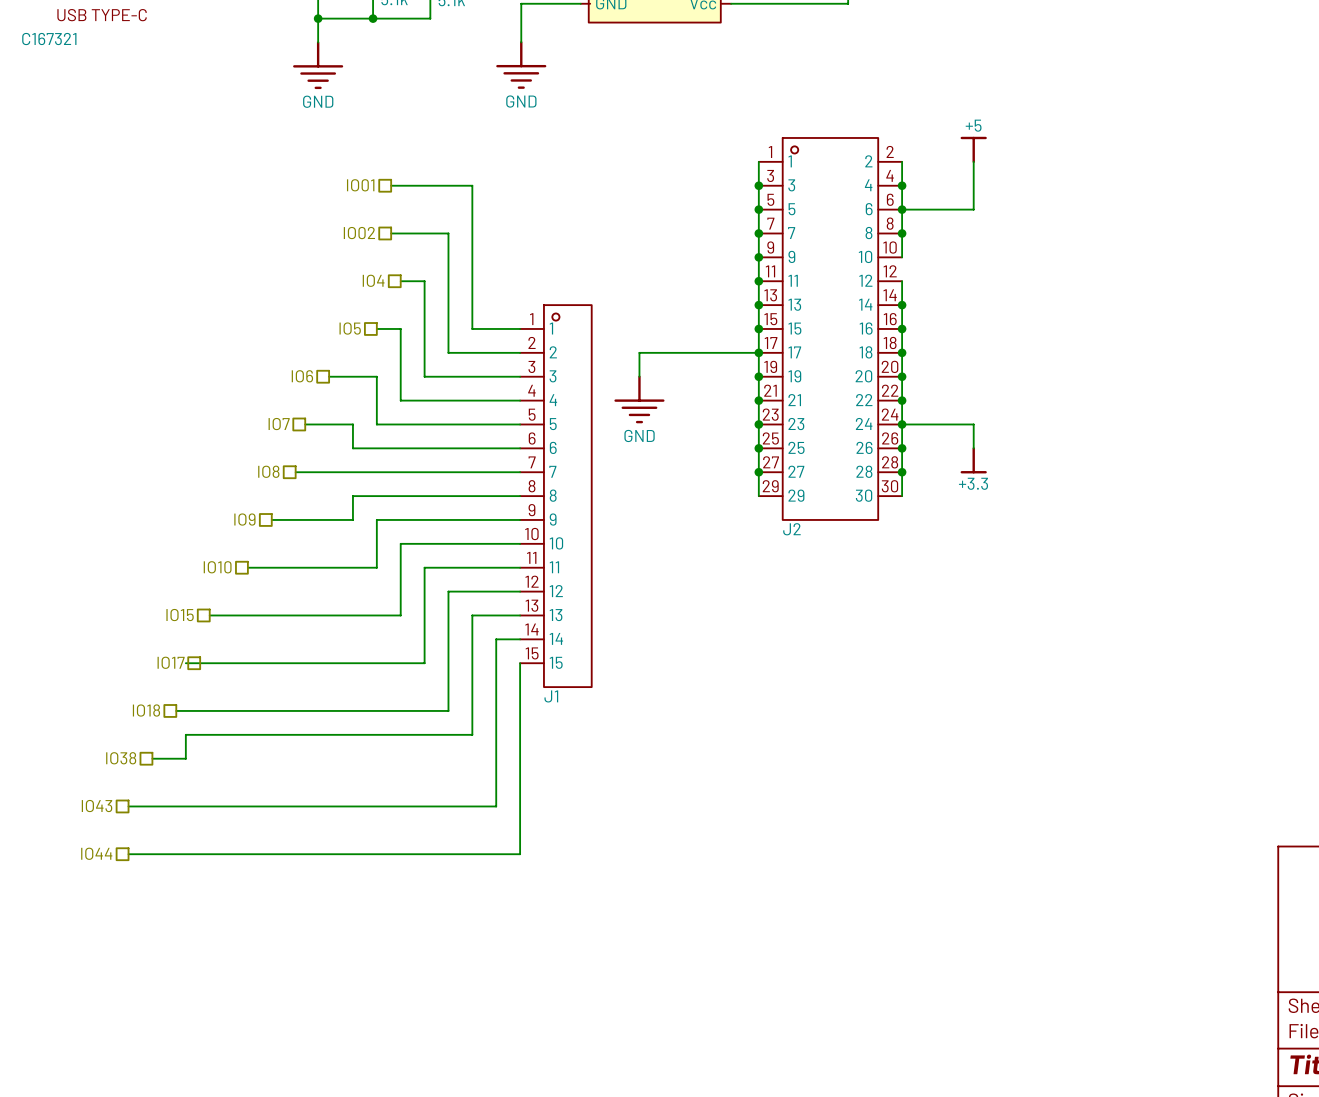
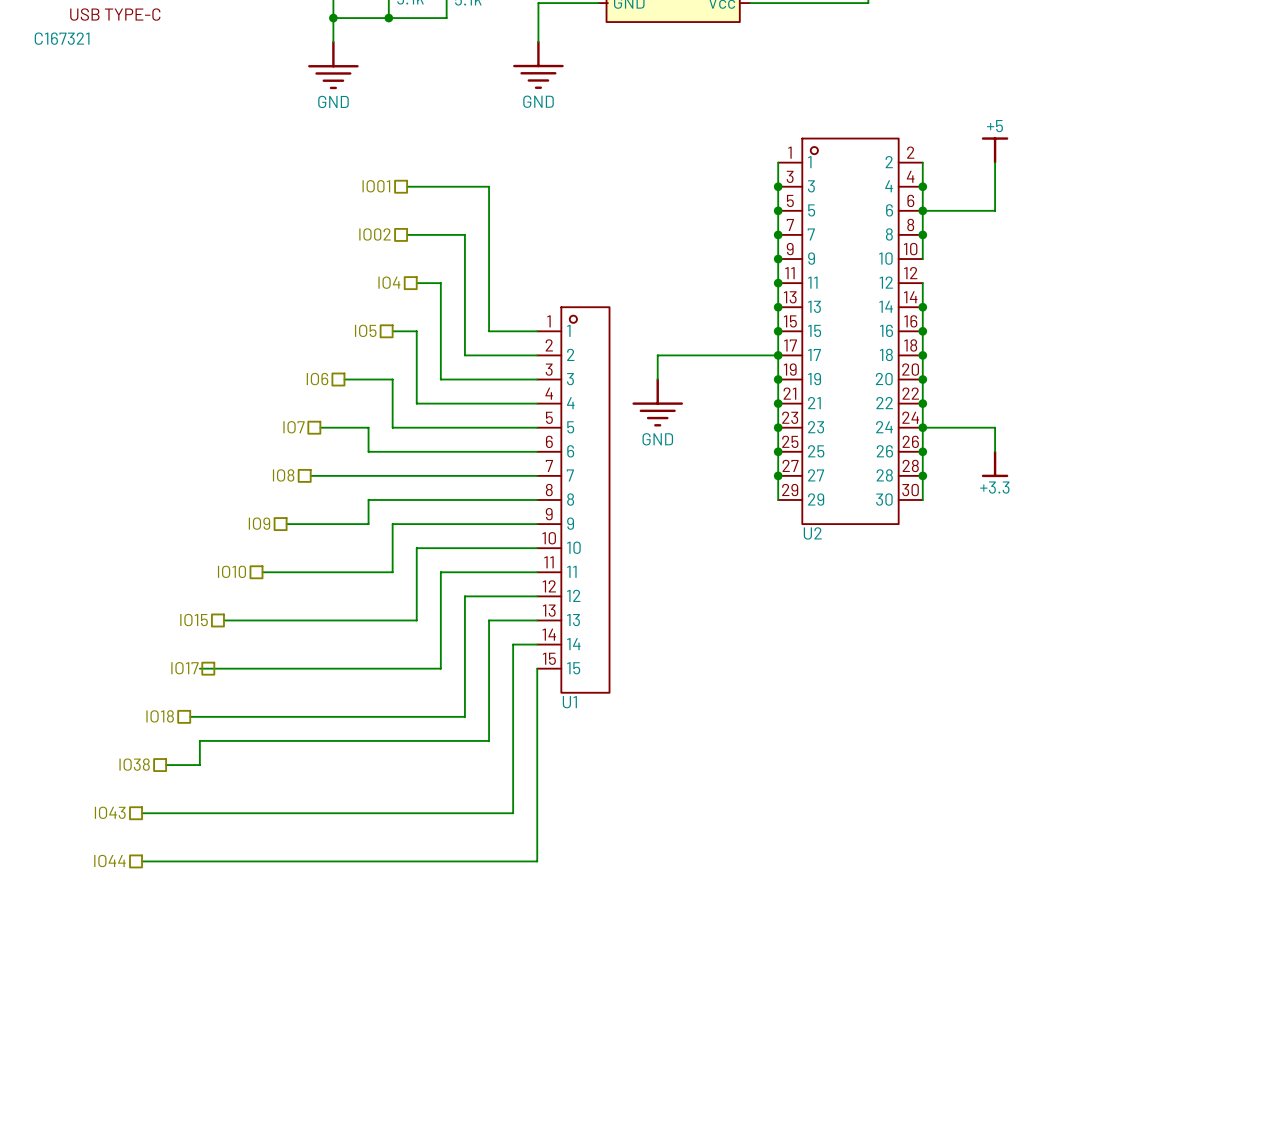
J2 name: J2 (791, 529) -> U2 (812, 533)
J1 name: J1 (551, 696) -> U1 (569, 702)

